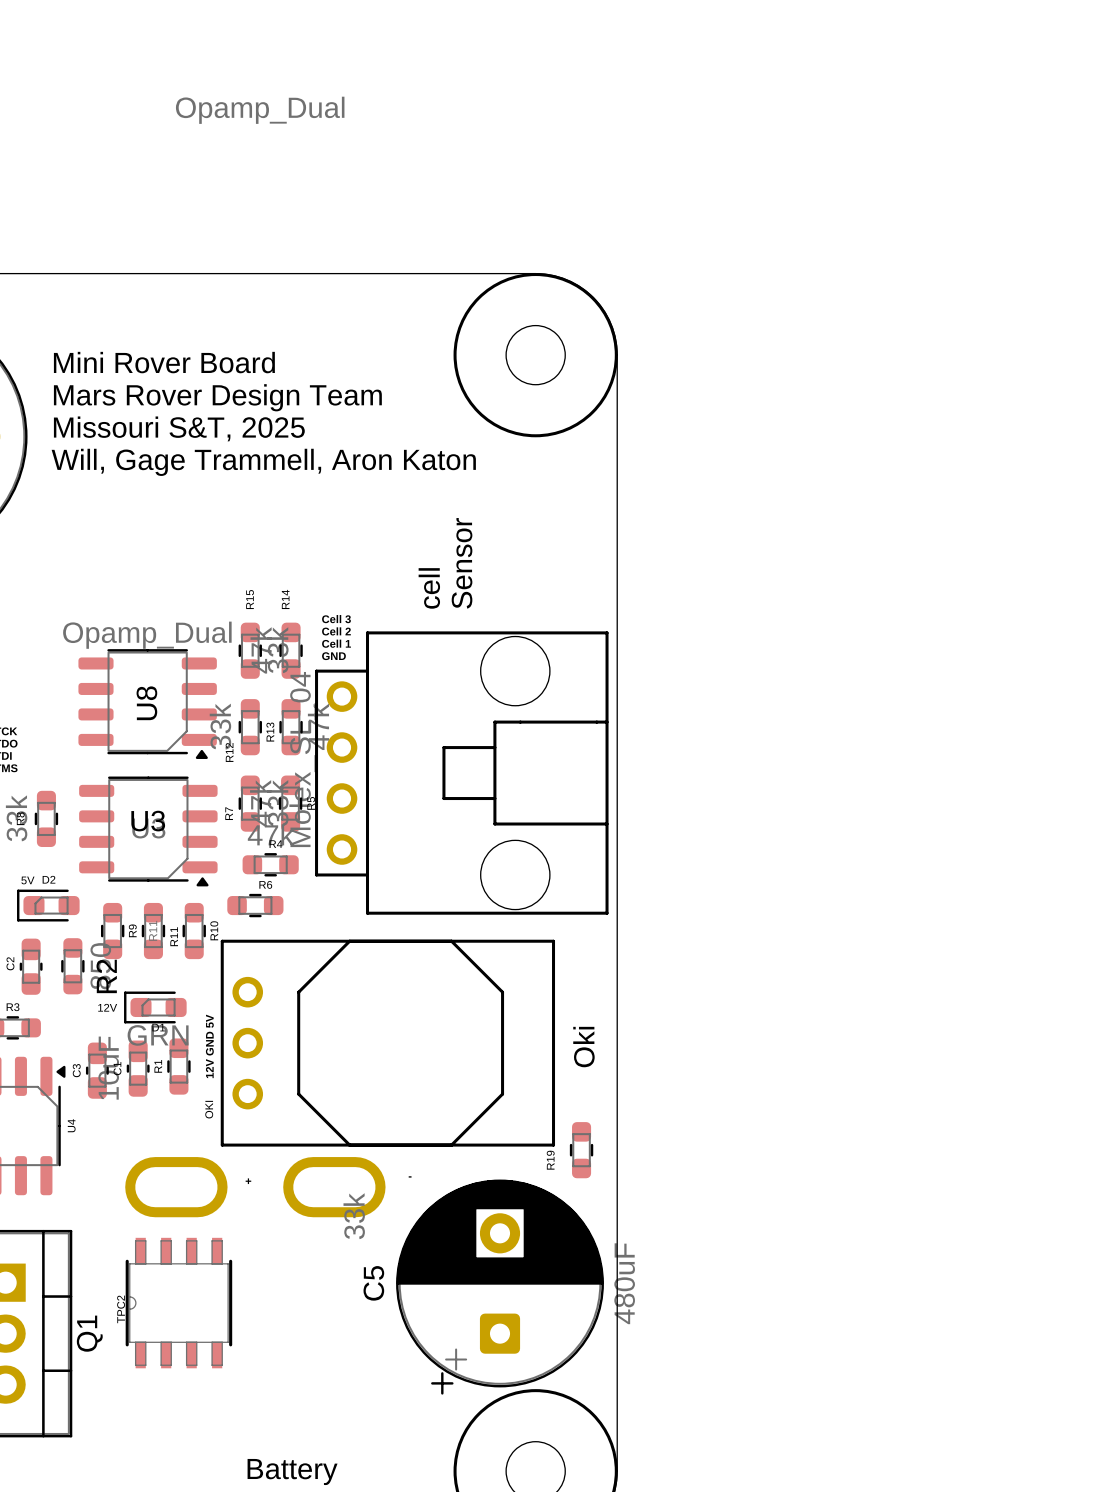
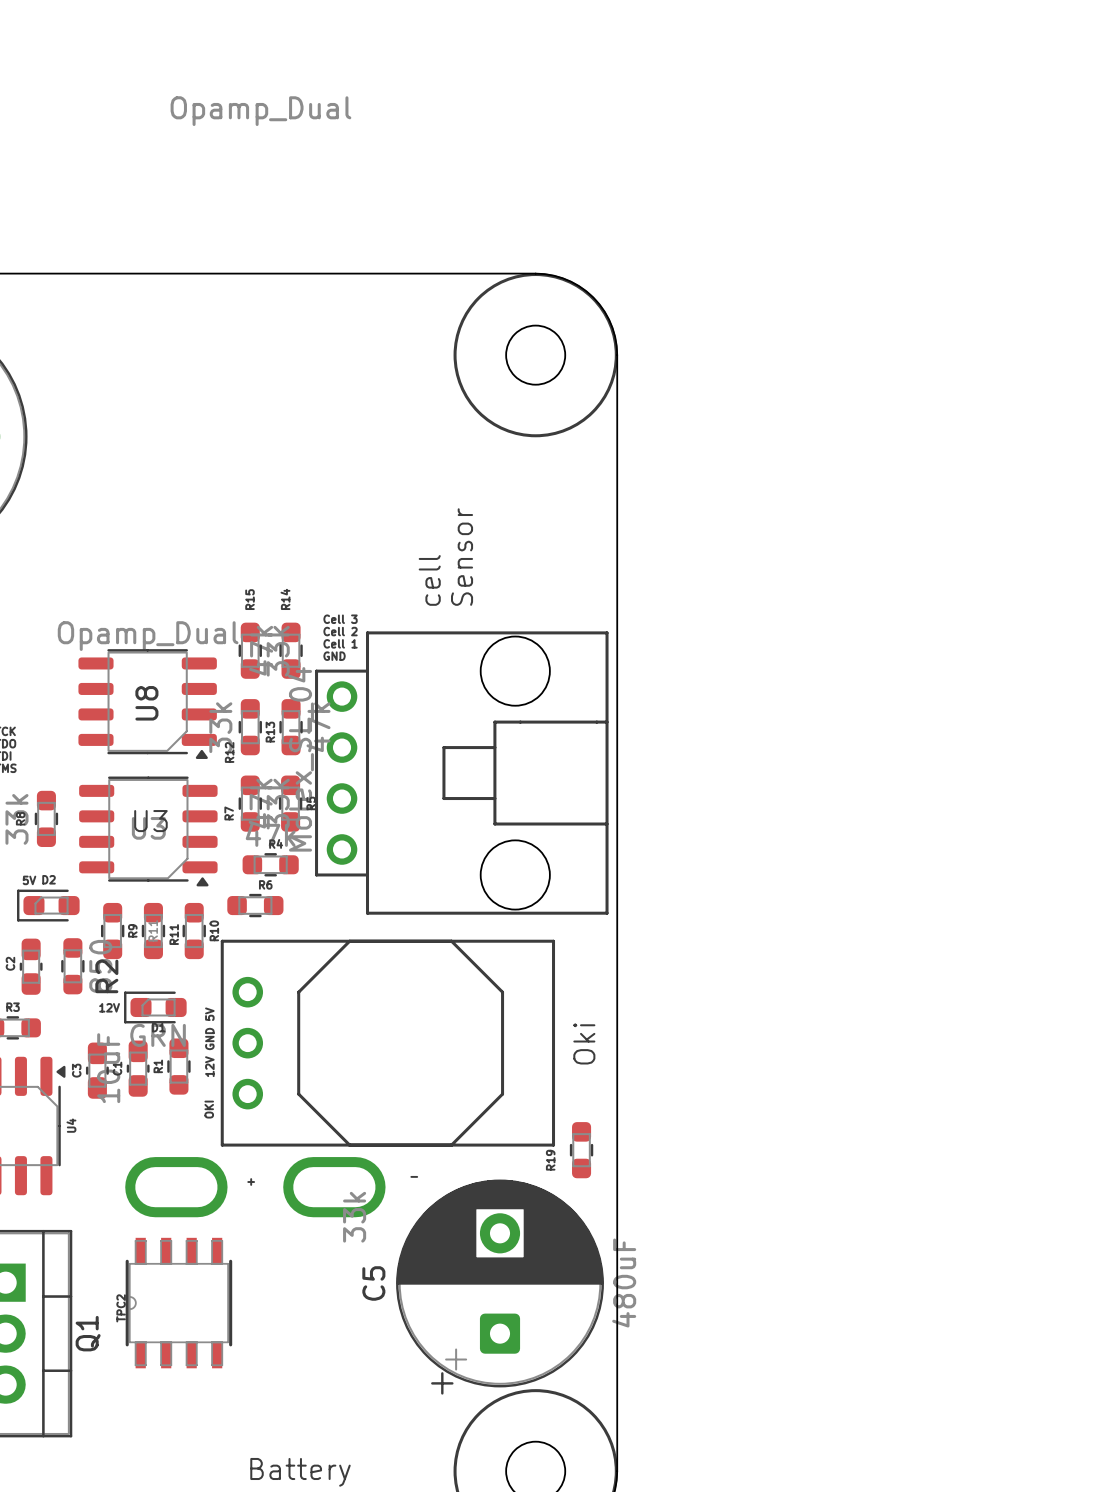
text: Mini Rover Board (164, 362) -> none
text: Mars Rover Design Team (217, 397) -> none
text: Missouri S&T, 2025 (179, 428) -> none
text: Will, Gage Trammell, Aron Katon (263, 462) -> none

